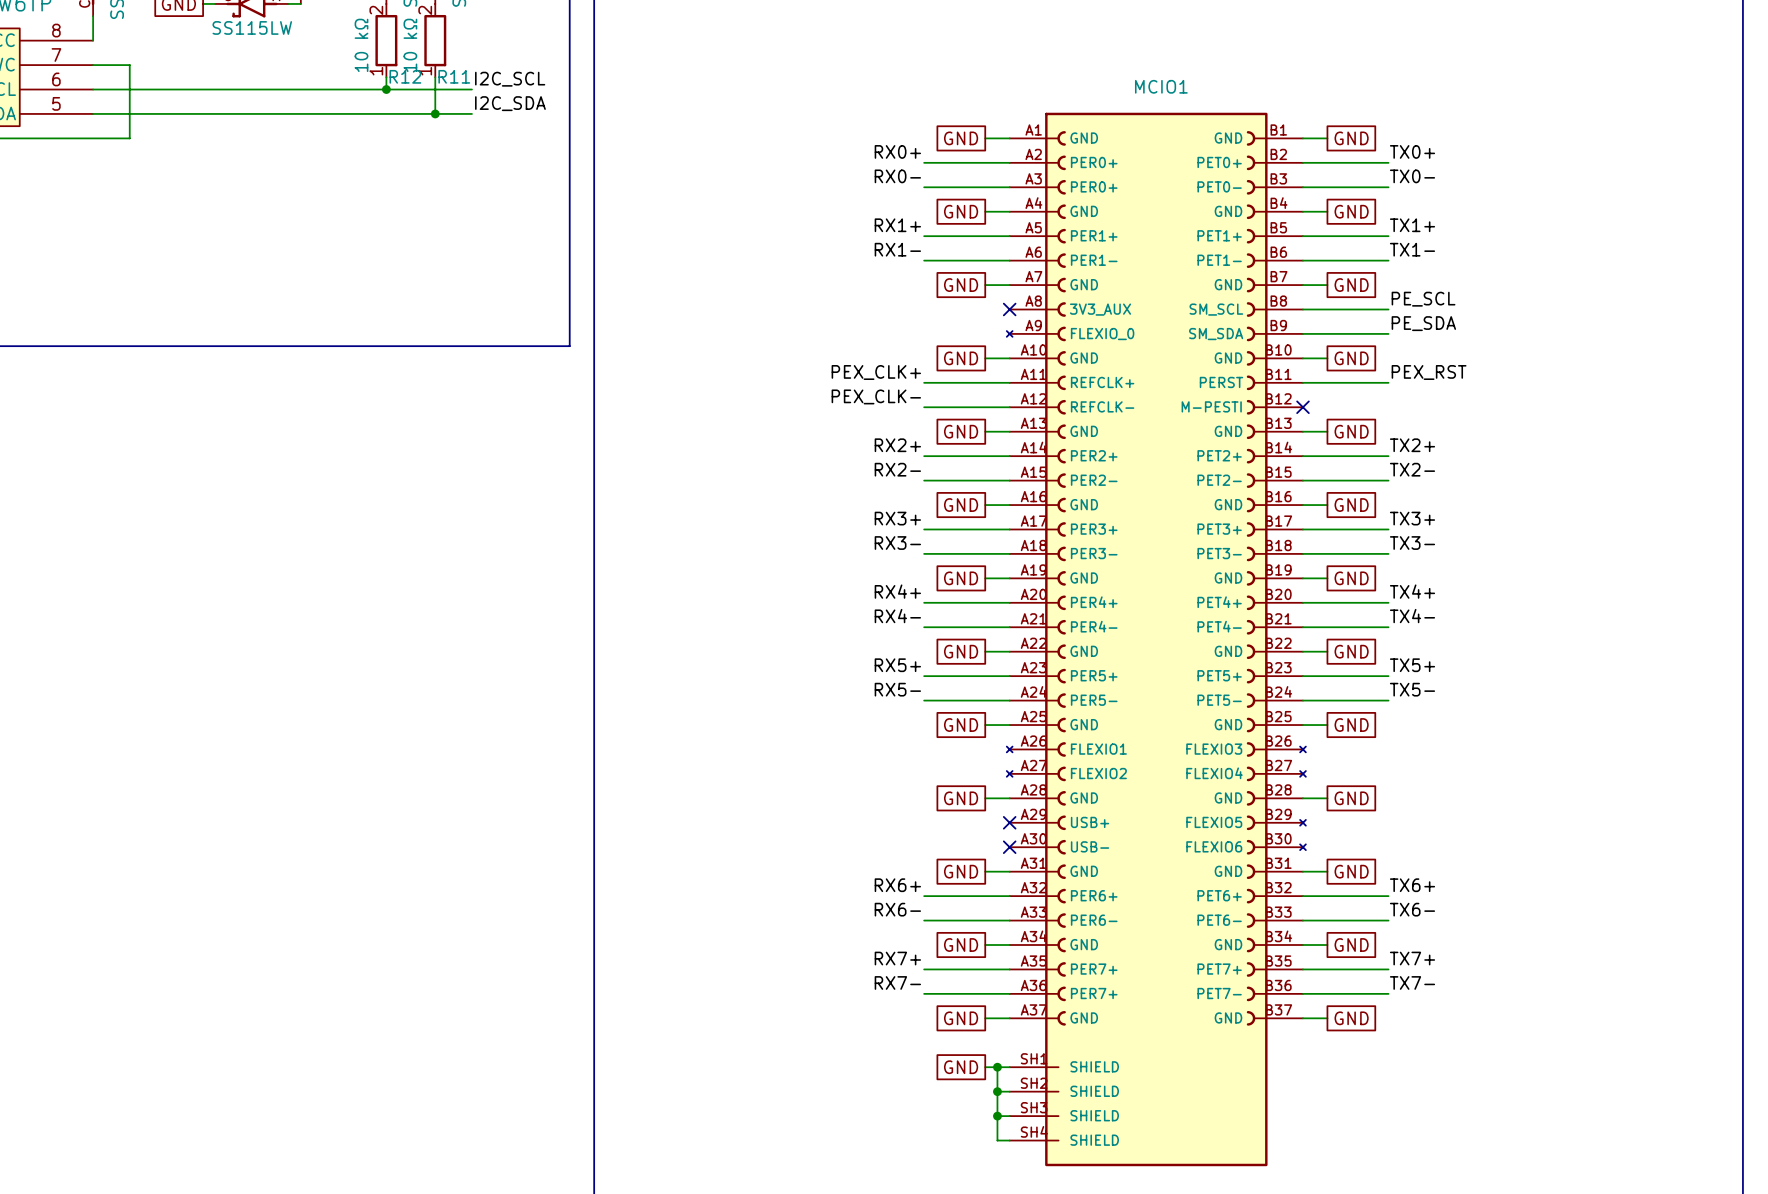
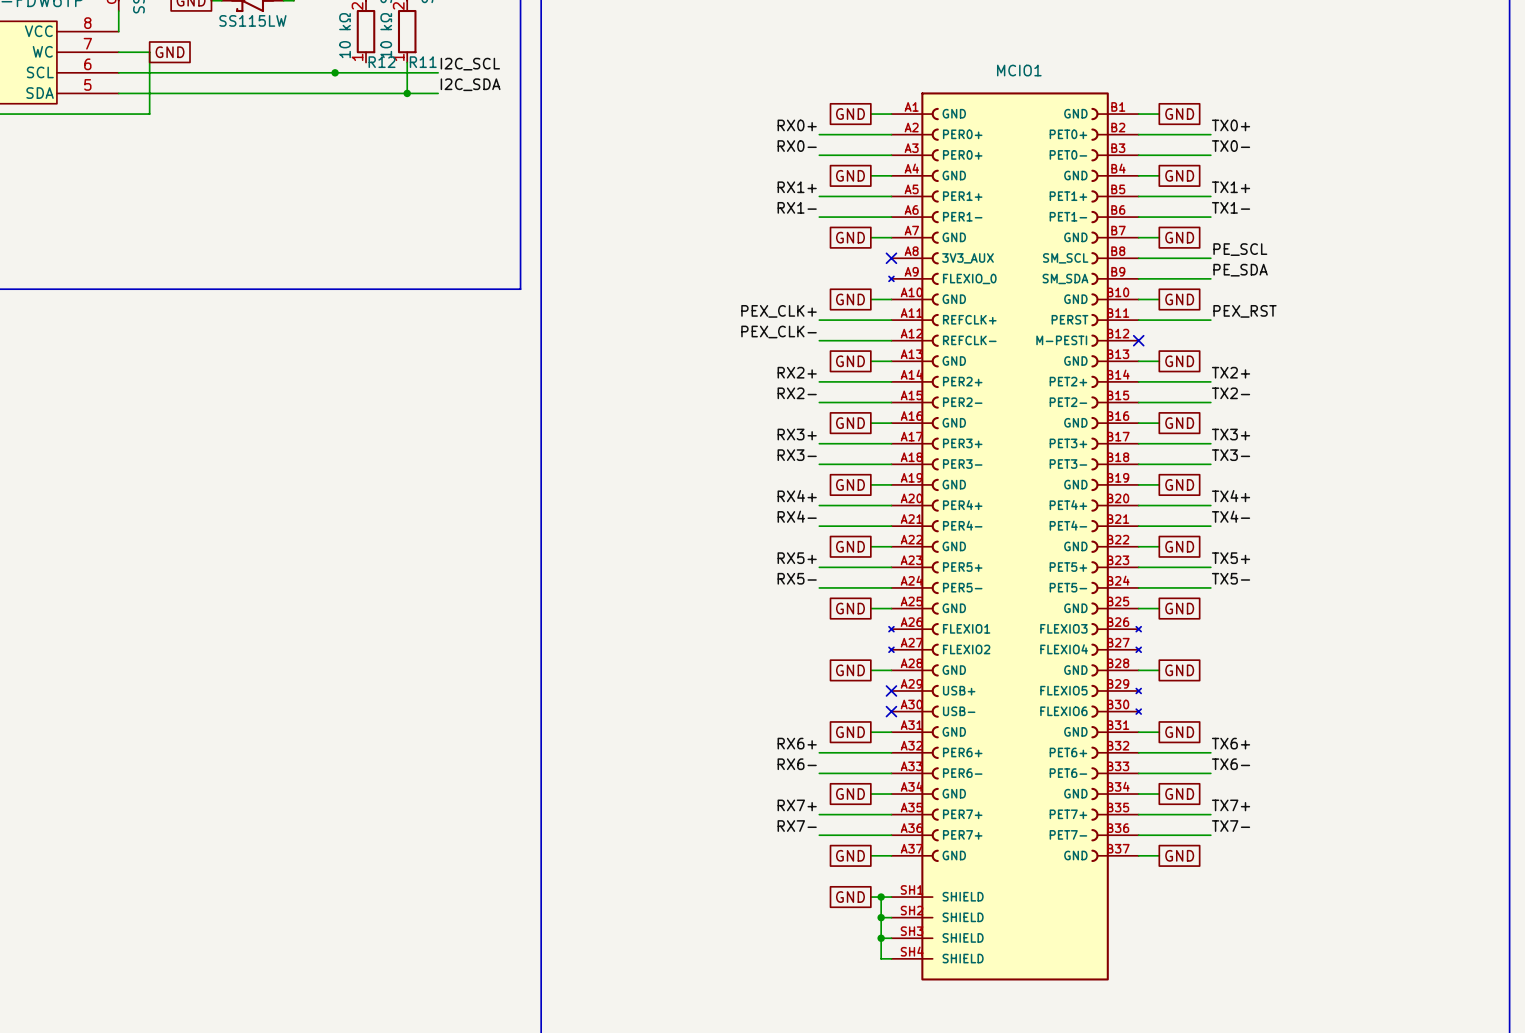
global label: none -> GND (170, 52)
wire: (386, 77) (386, 89) -> none
junction position: (386, 89) -> (335, 72)

